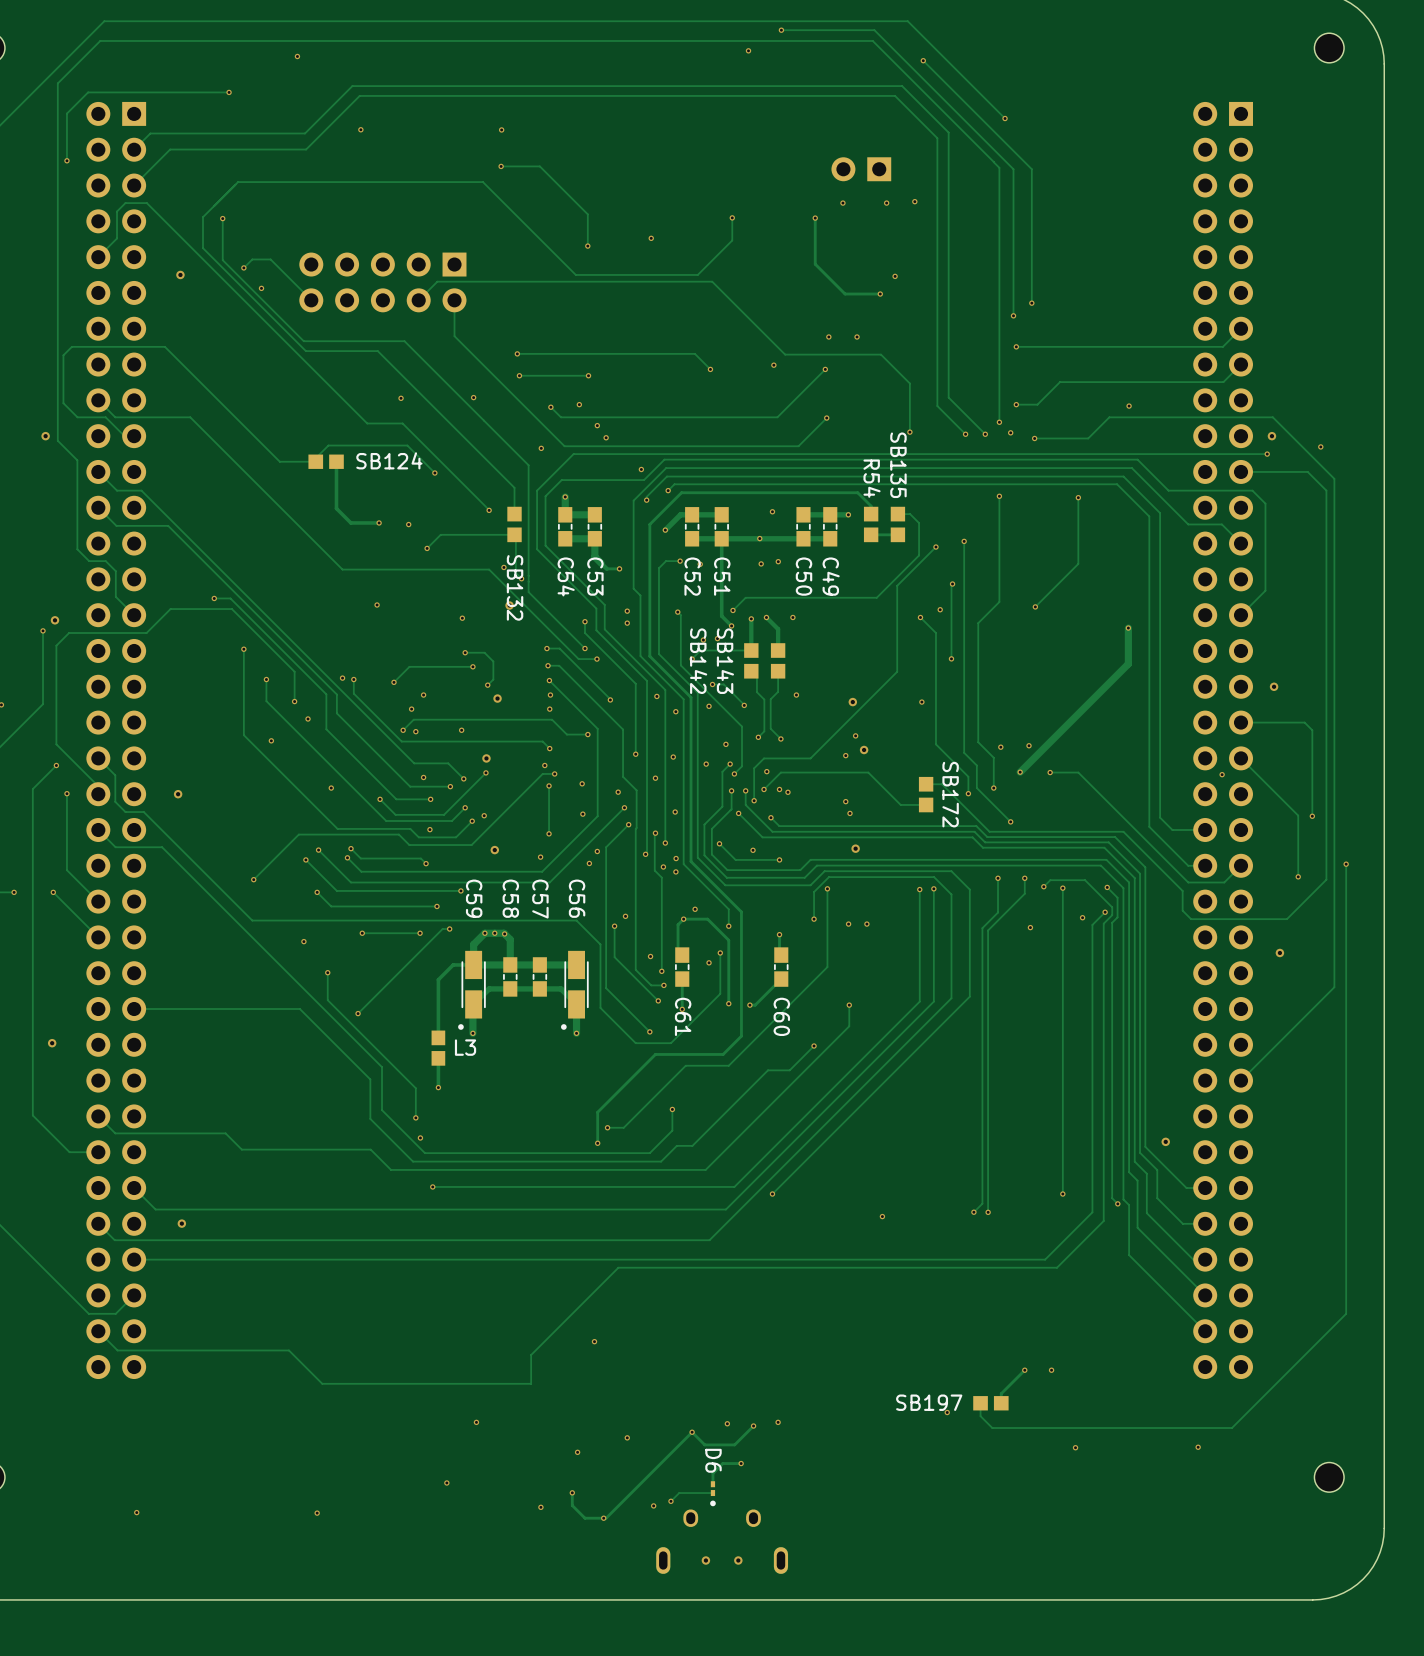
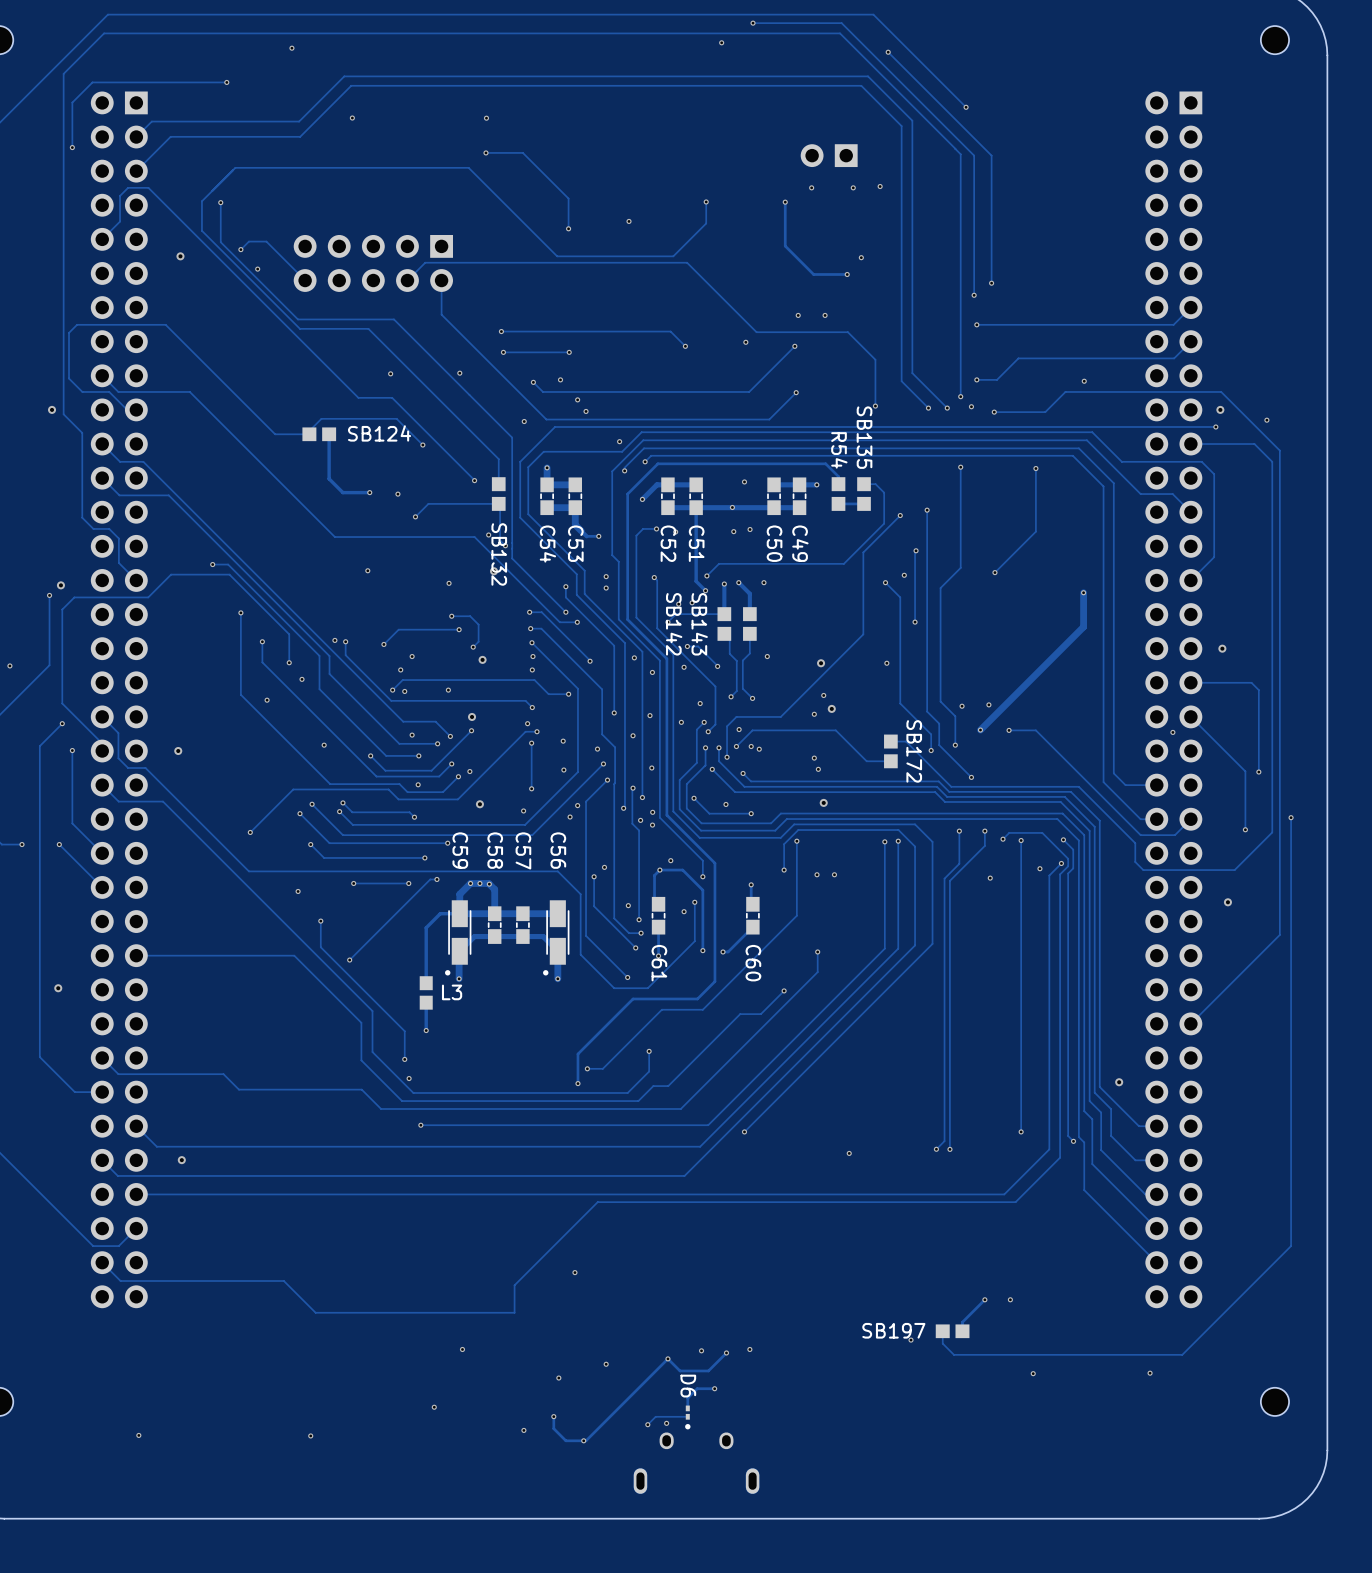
via position: (653, 1505) -> (666, 1423)
via: (705, 1560) -> none
via: (738, 1560) -> none

